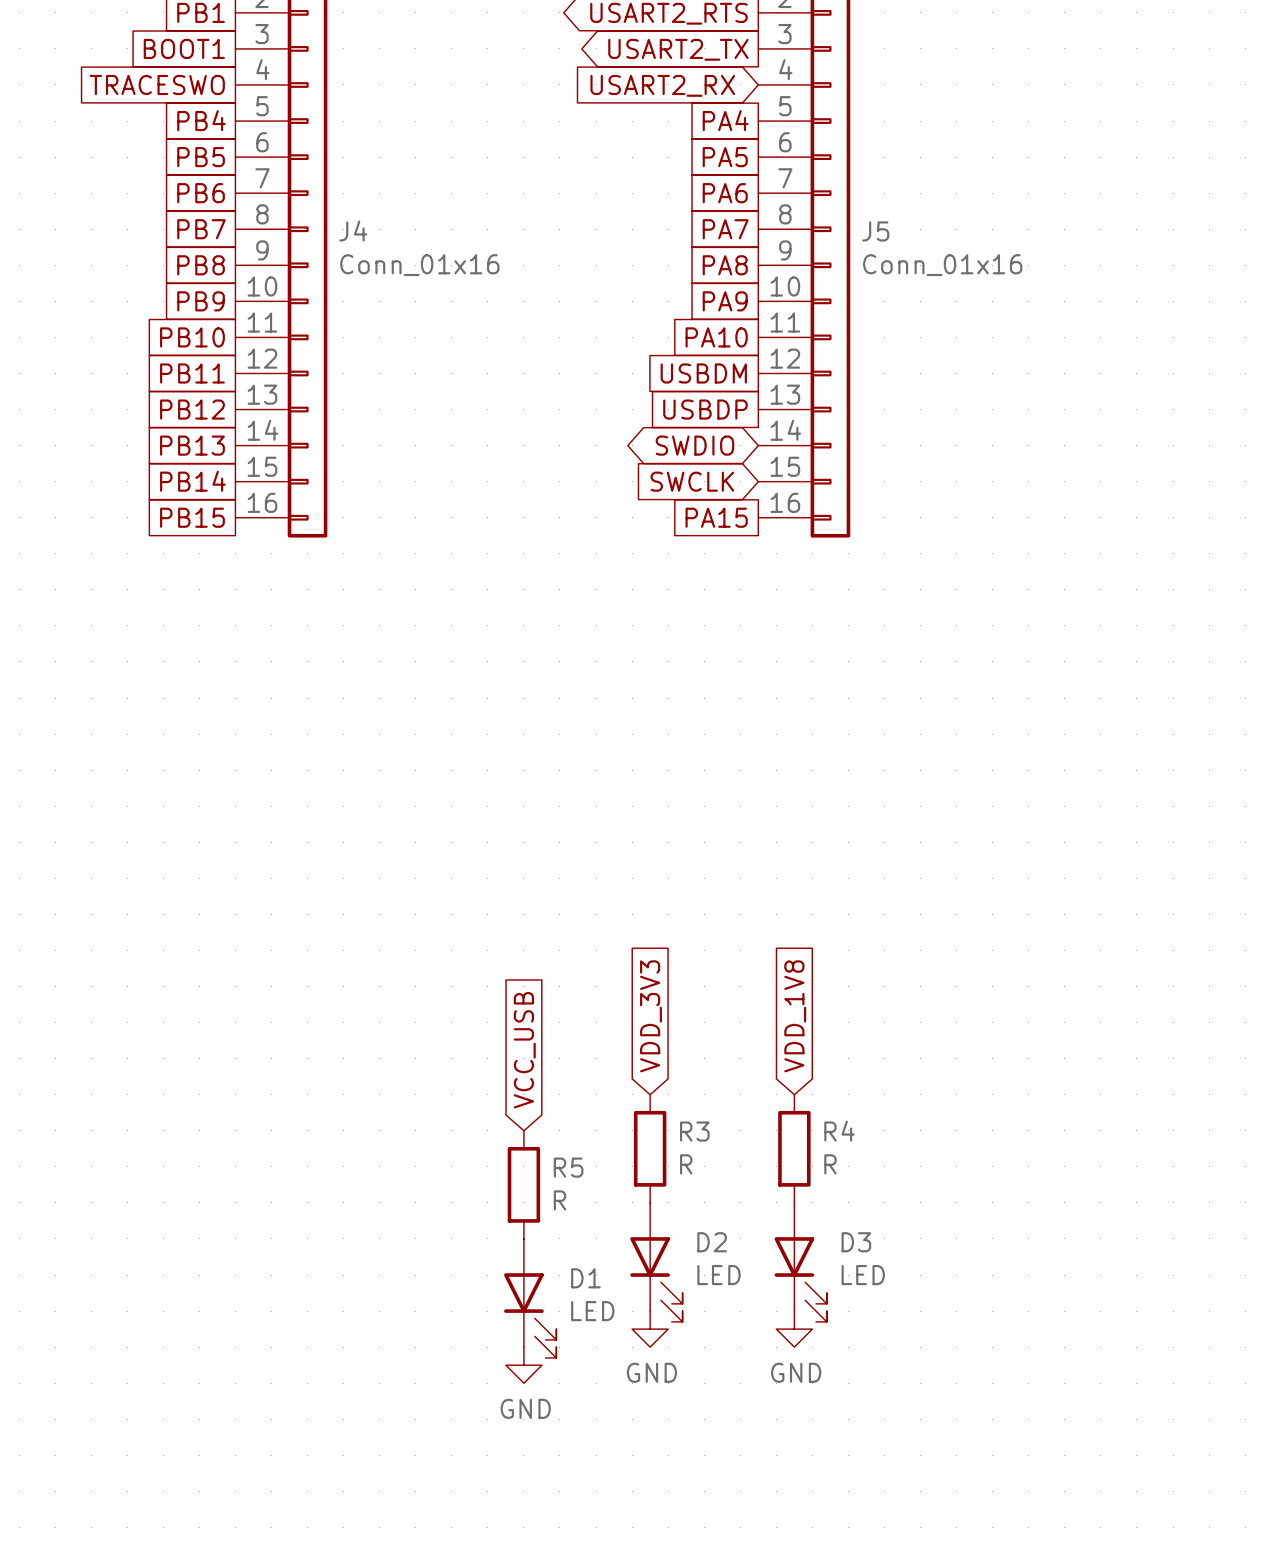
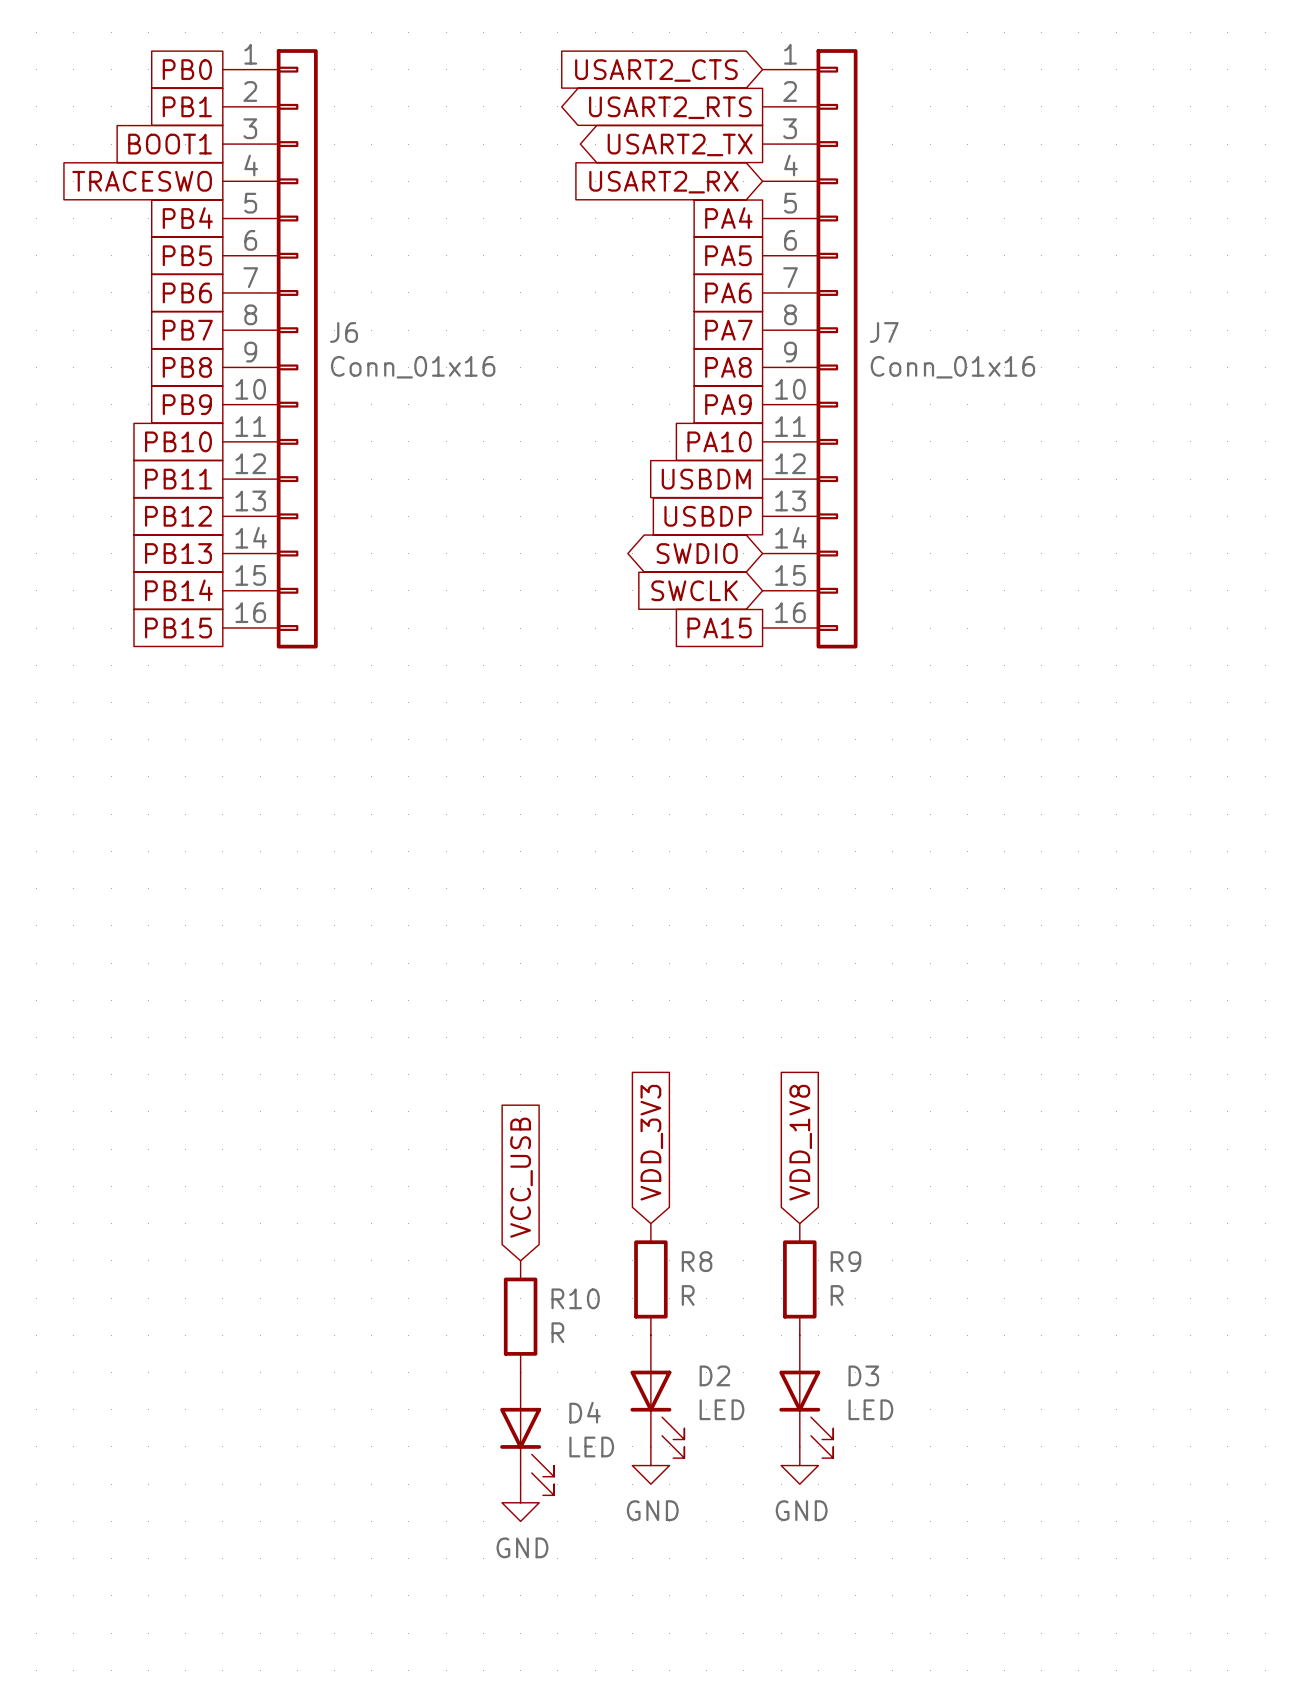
J4 name: J4 (353, 231) -> J6 (344, 332)
J5 name: J5 (875, 231) -> J7 (884, 332)
R3 name: R3 (694, 1131) -> R8 (697, 1261)
R4 name: R4 (839, 1131) -> R9 (845, 1261)
R5 name: R5 (568, 1167) -> R10 (575, 1298)
D1 name: D1 (585, 1278) -> D4 (585, 1412)

